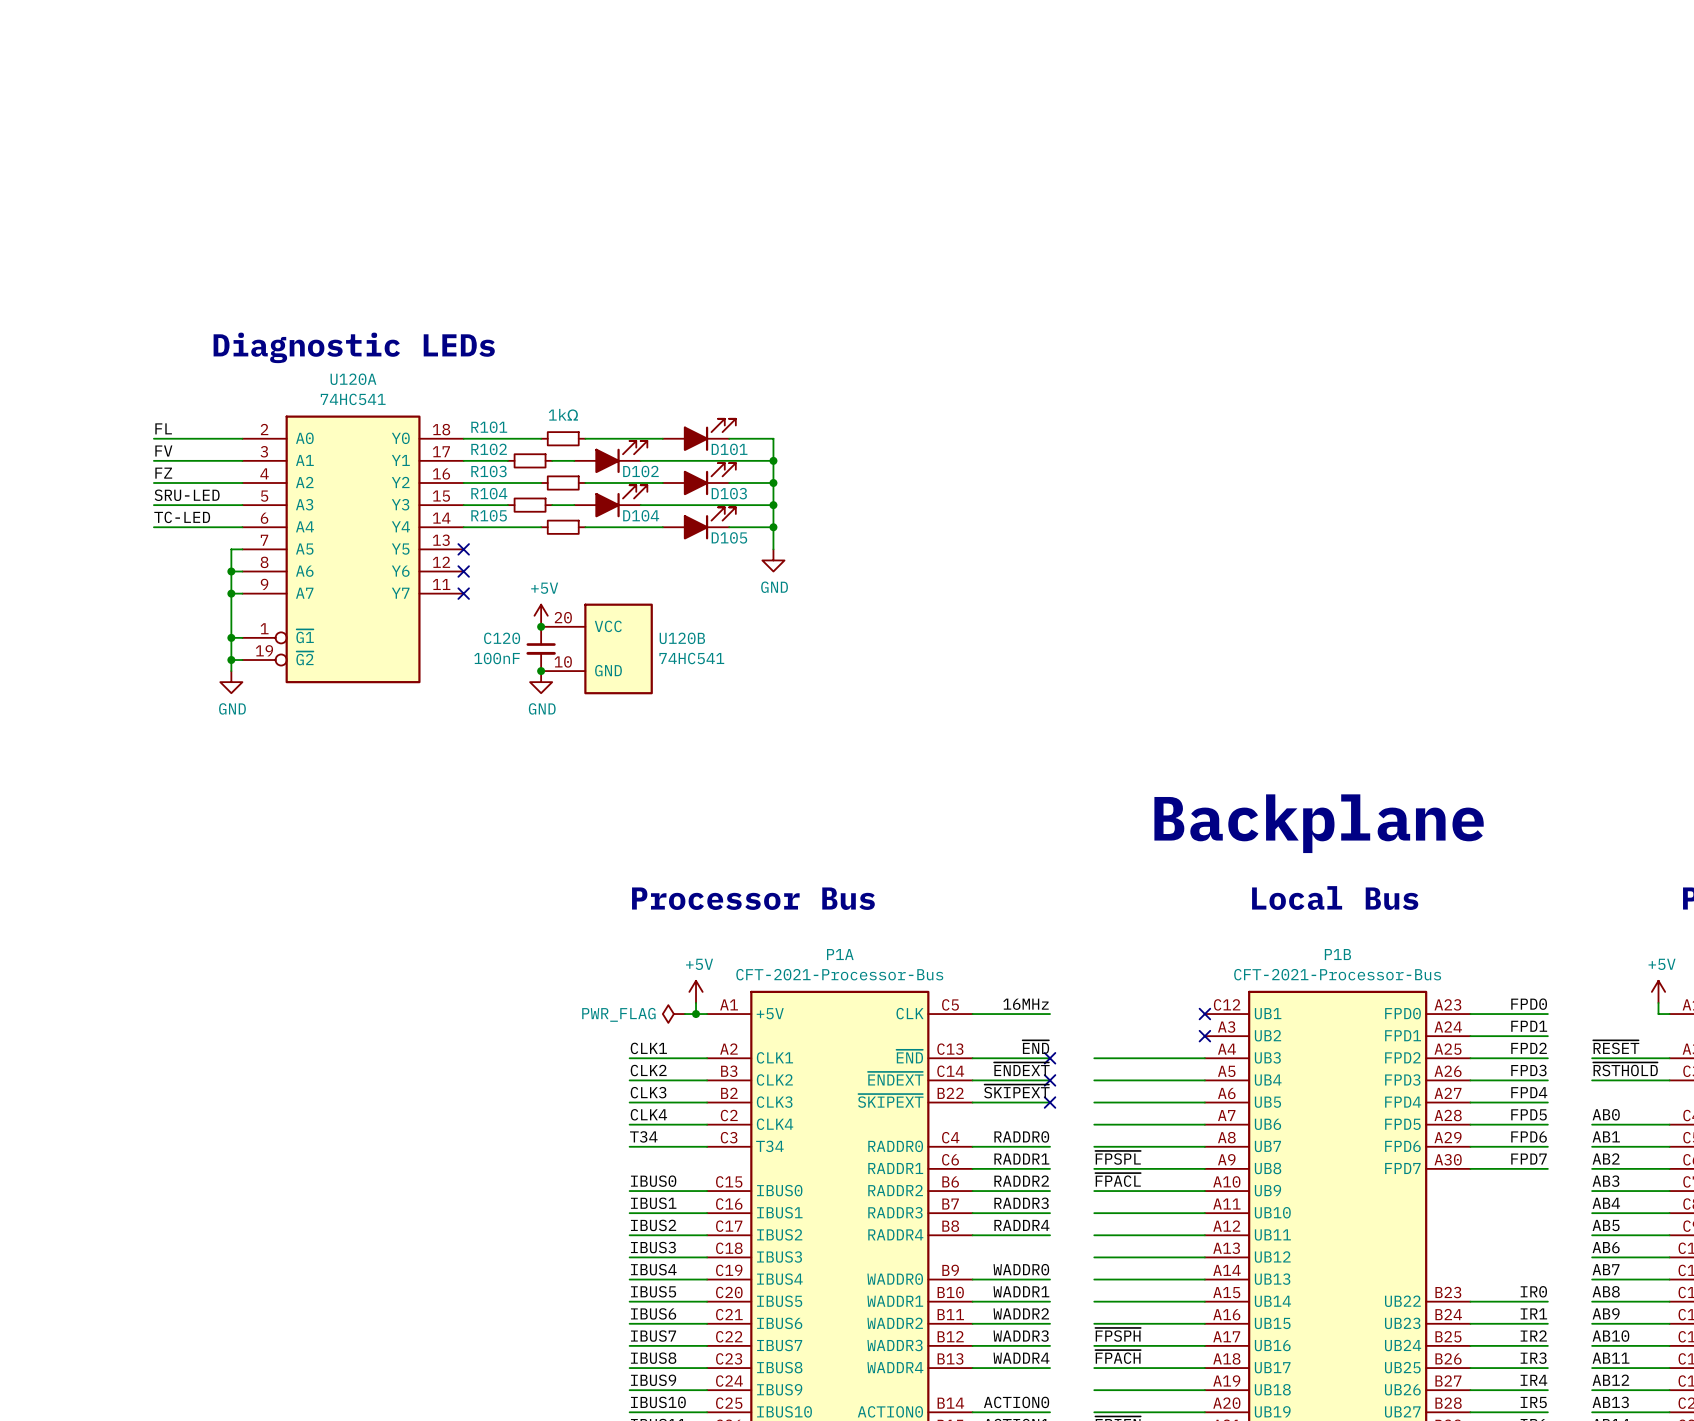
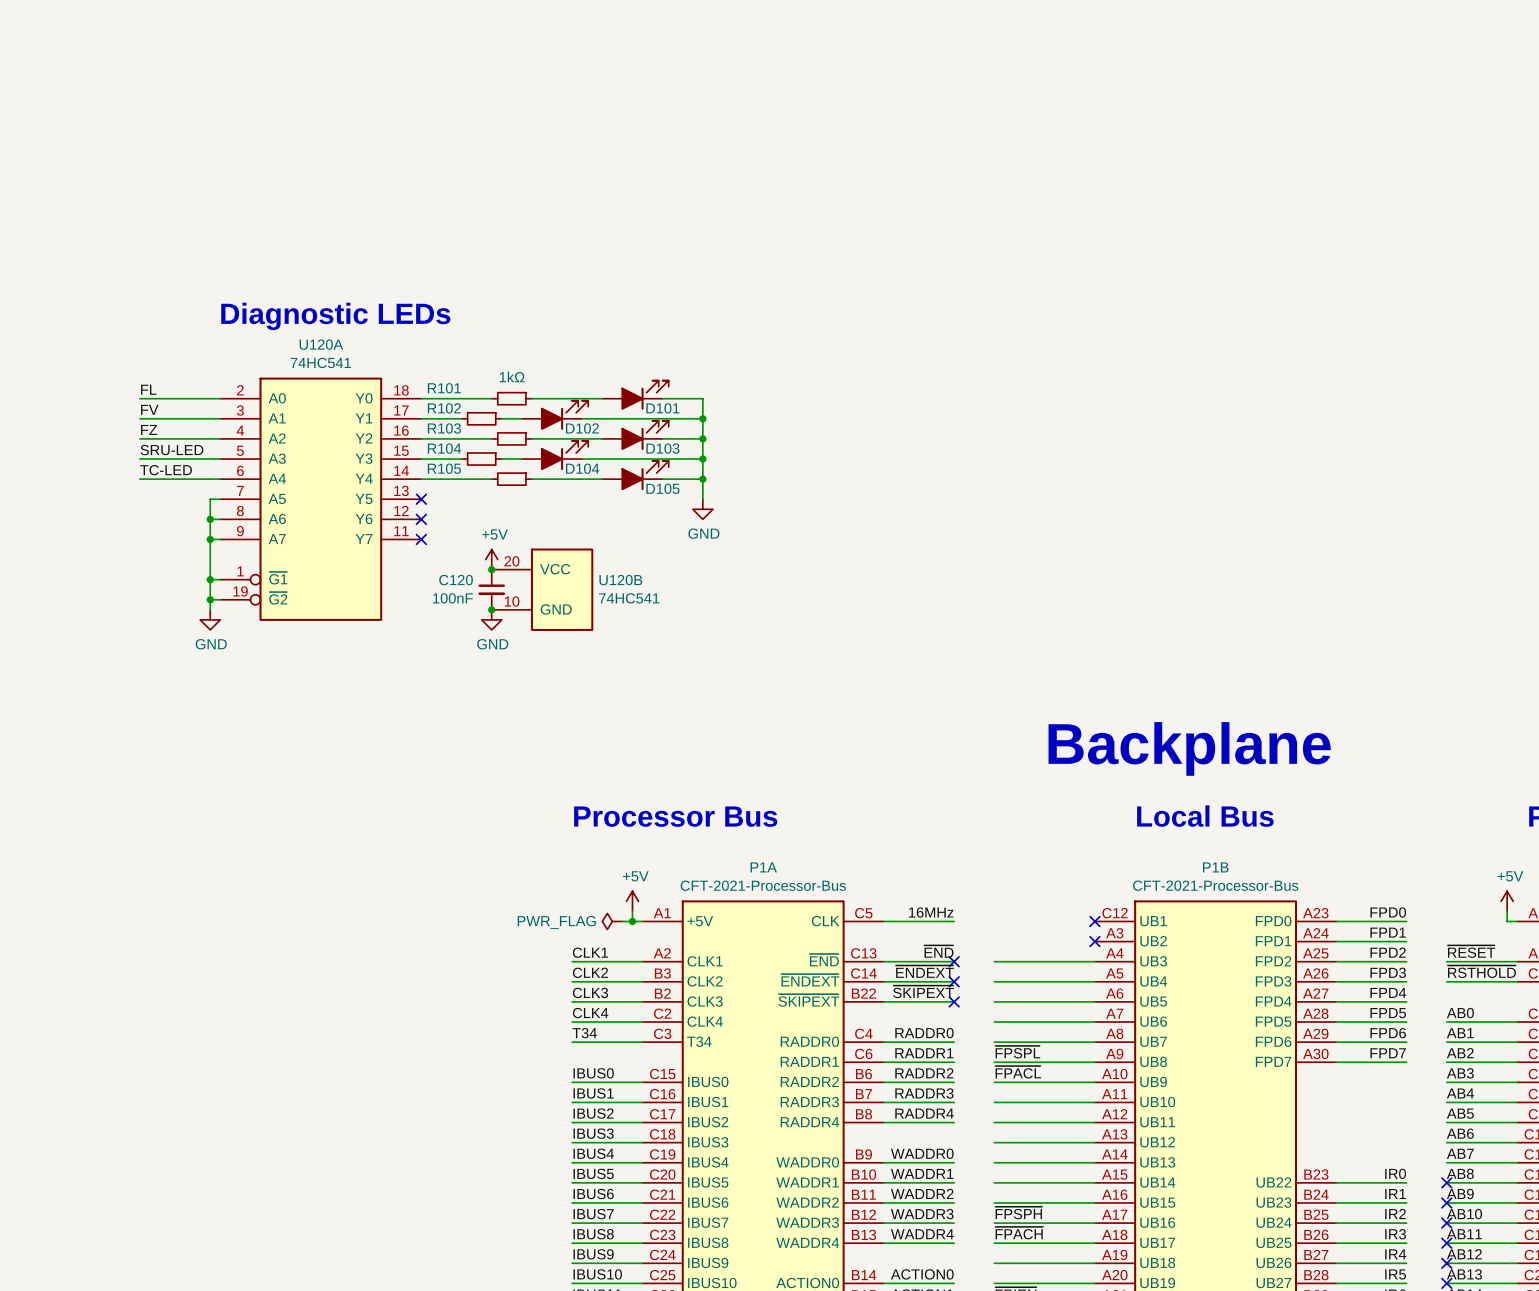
no-connect mark: none -> (1446, 1182)
no-connect mark: none -> (1446, 1202)
no-connect mark: none -> (1446, 1223)
no-connect mark: none -> (1446, 1243)
no-connect mark: none -> (1446, 1263)
no-connect mark: none -> (1446, 1283)

